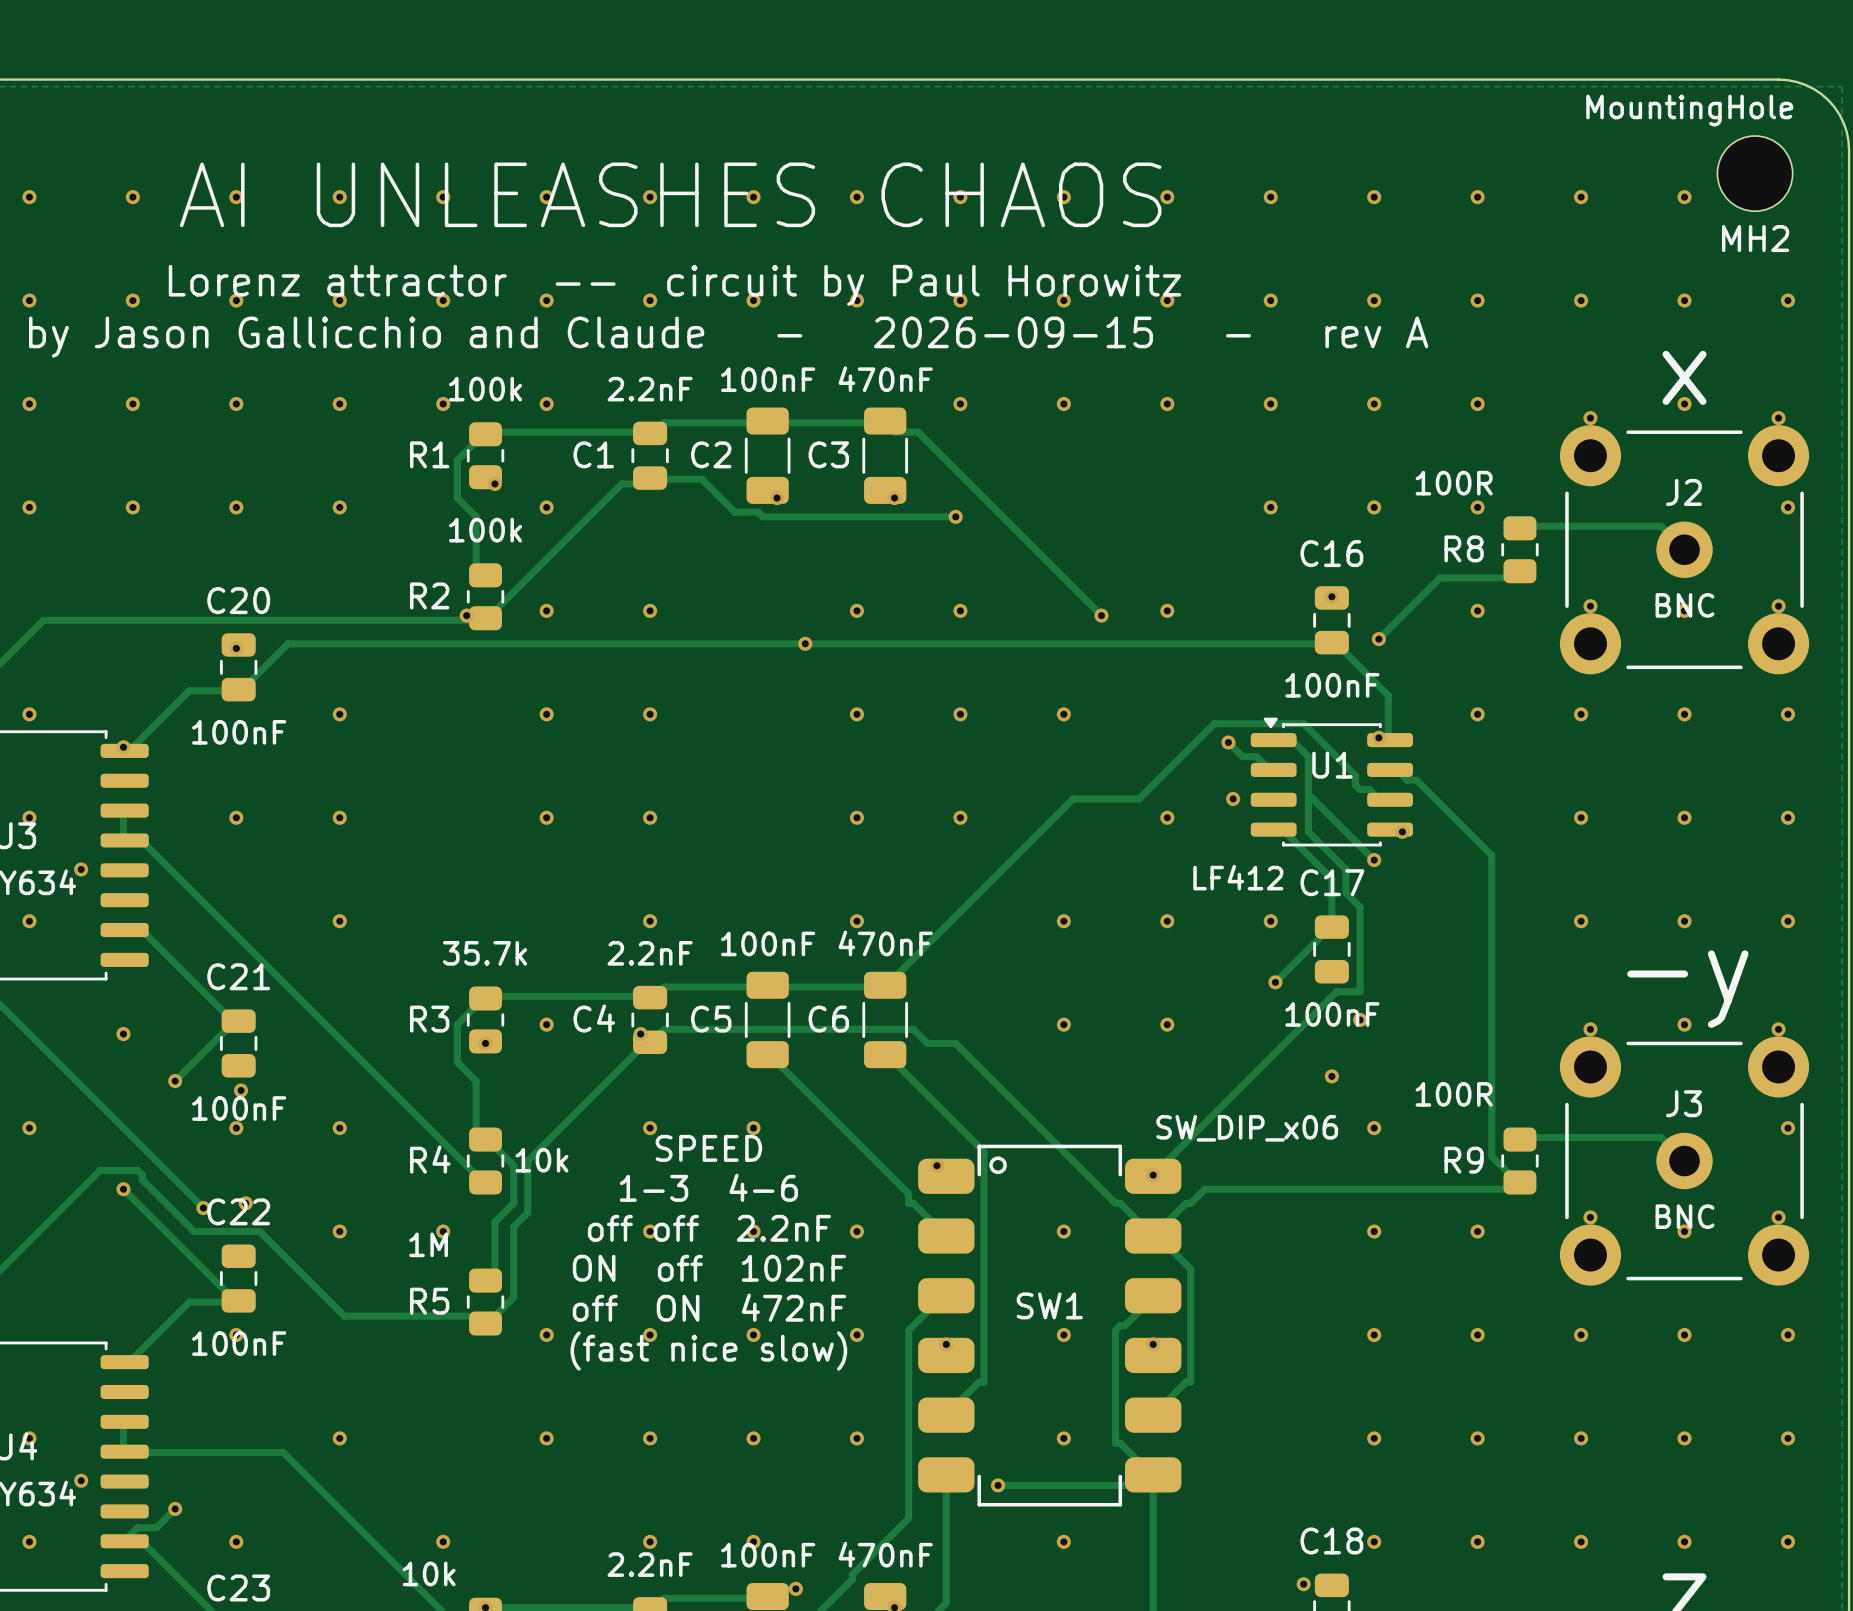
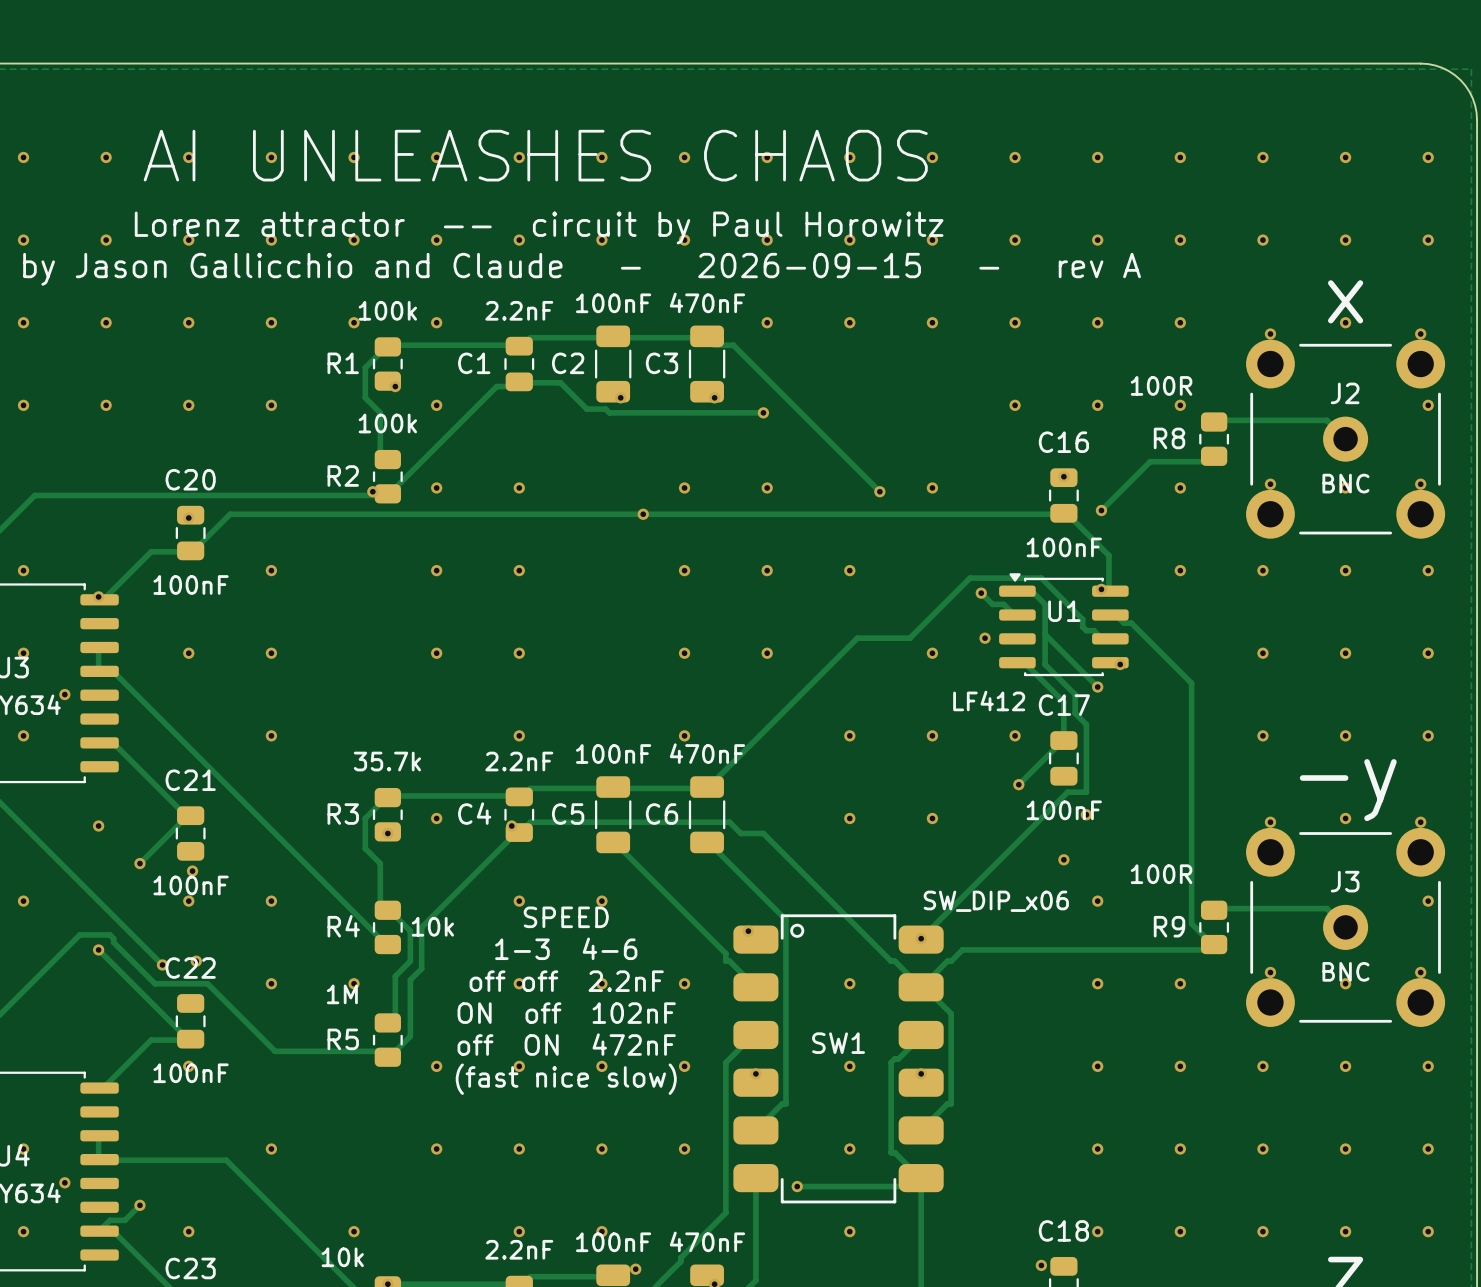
MH2: MountingHole (1755, 173) -> none
via: none -> (1428, 157)

